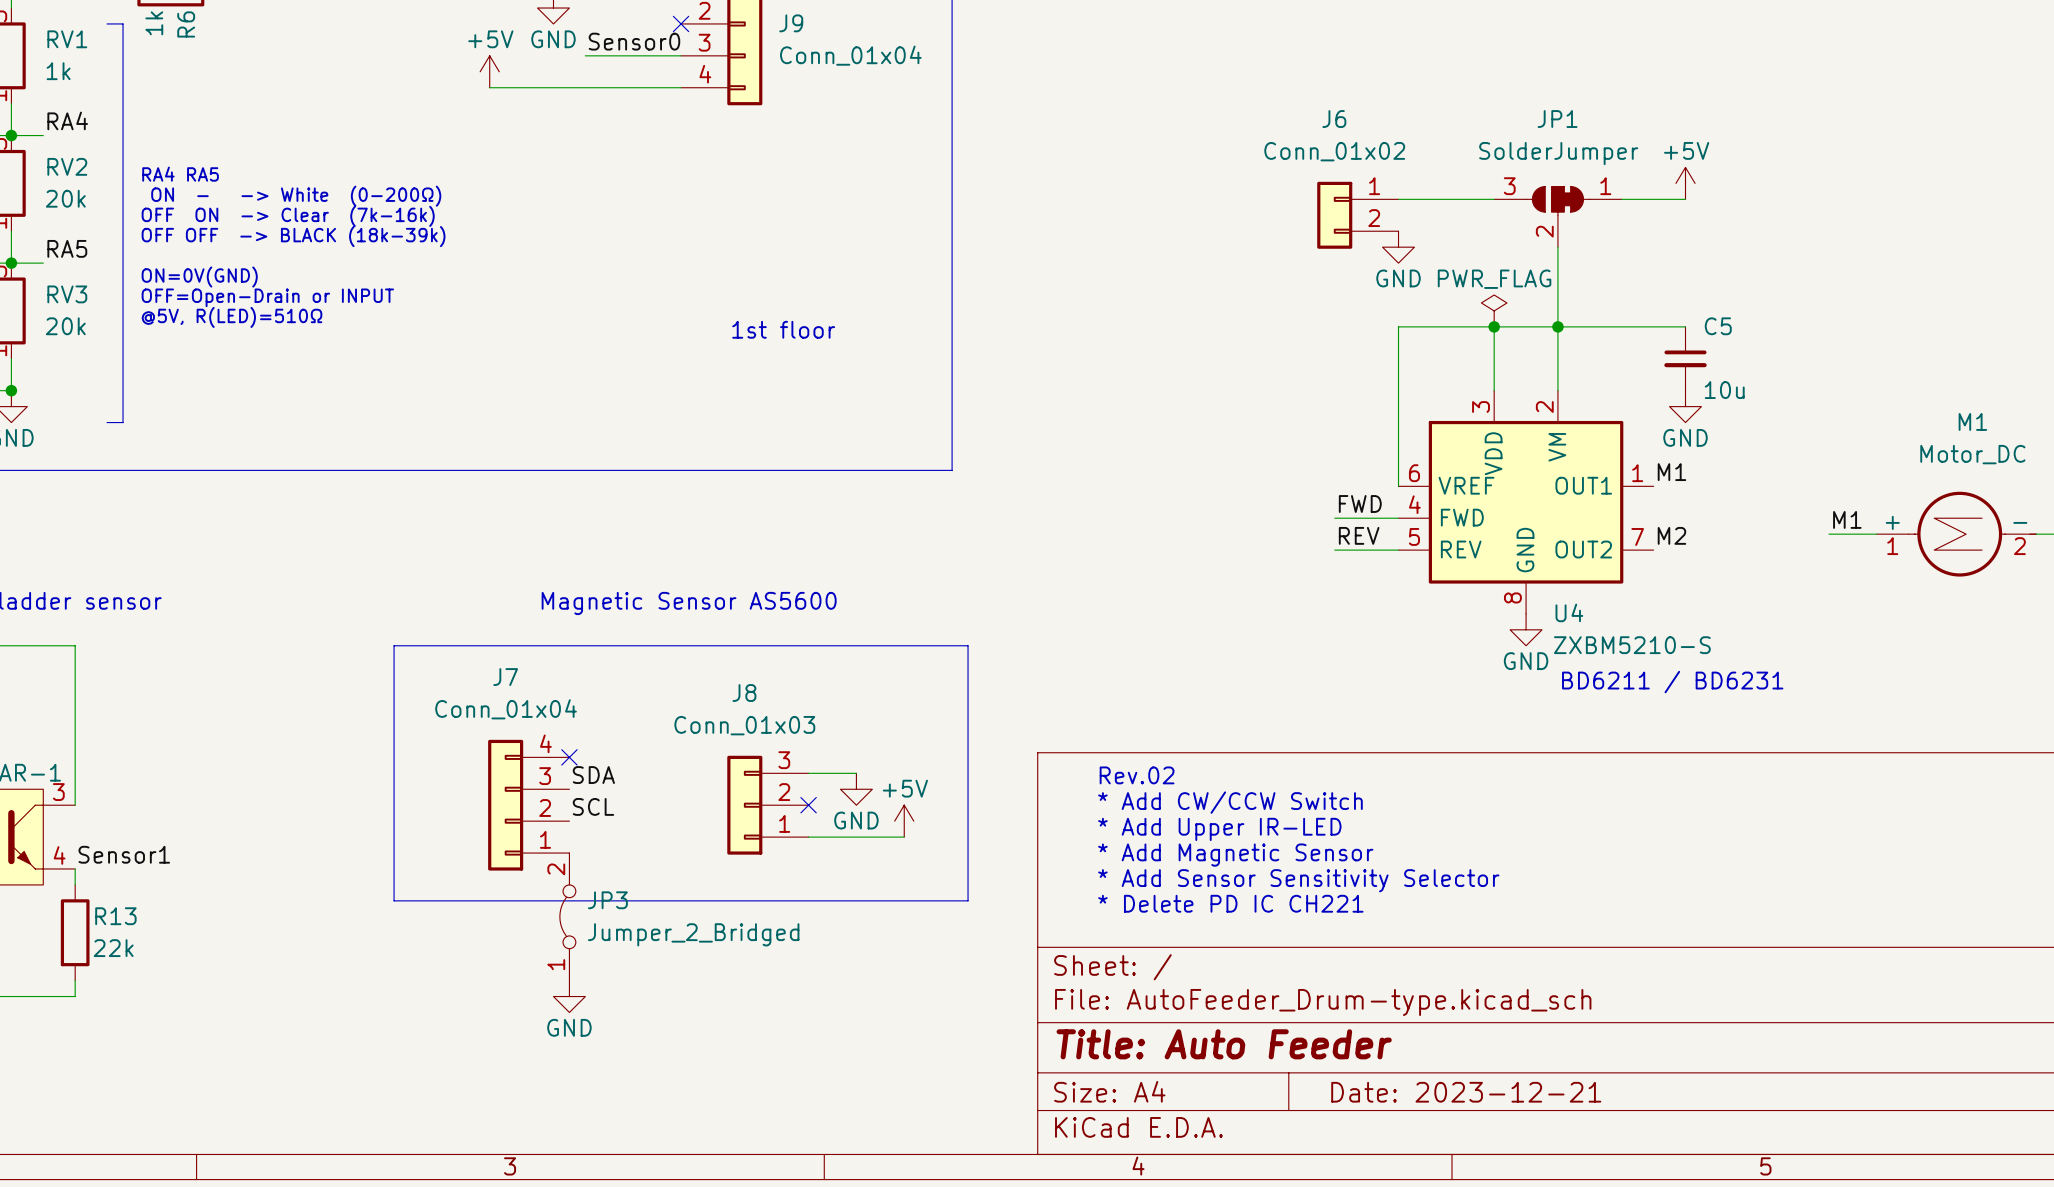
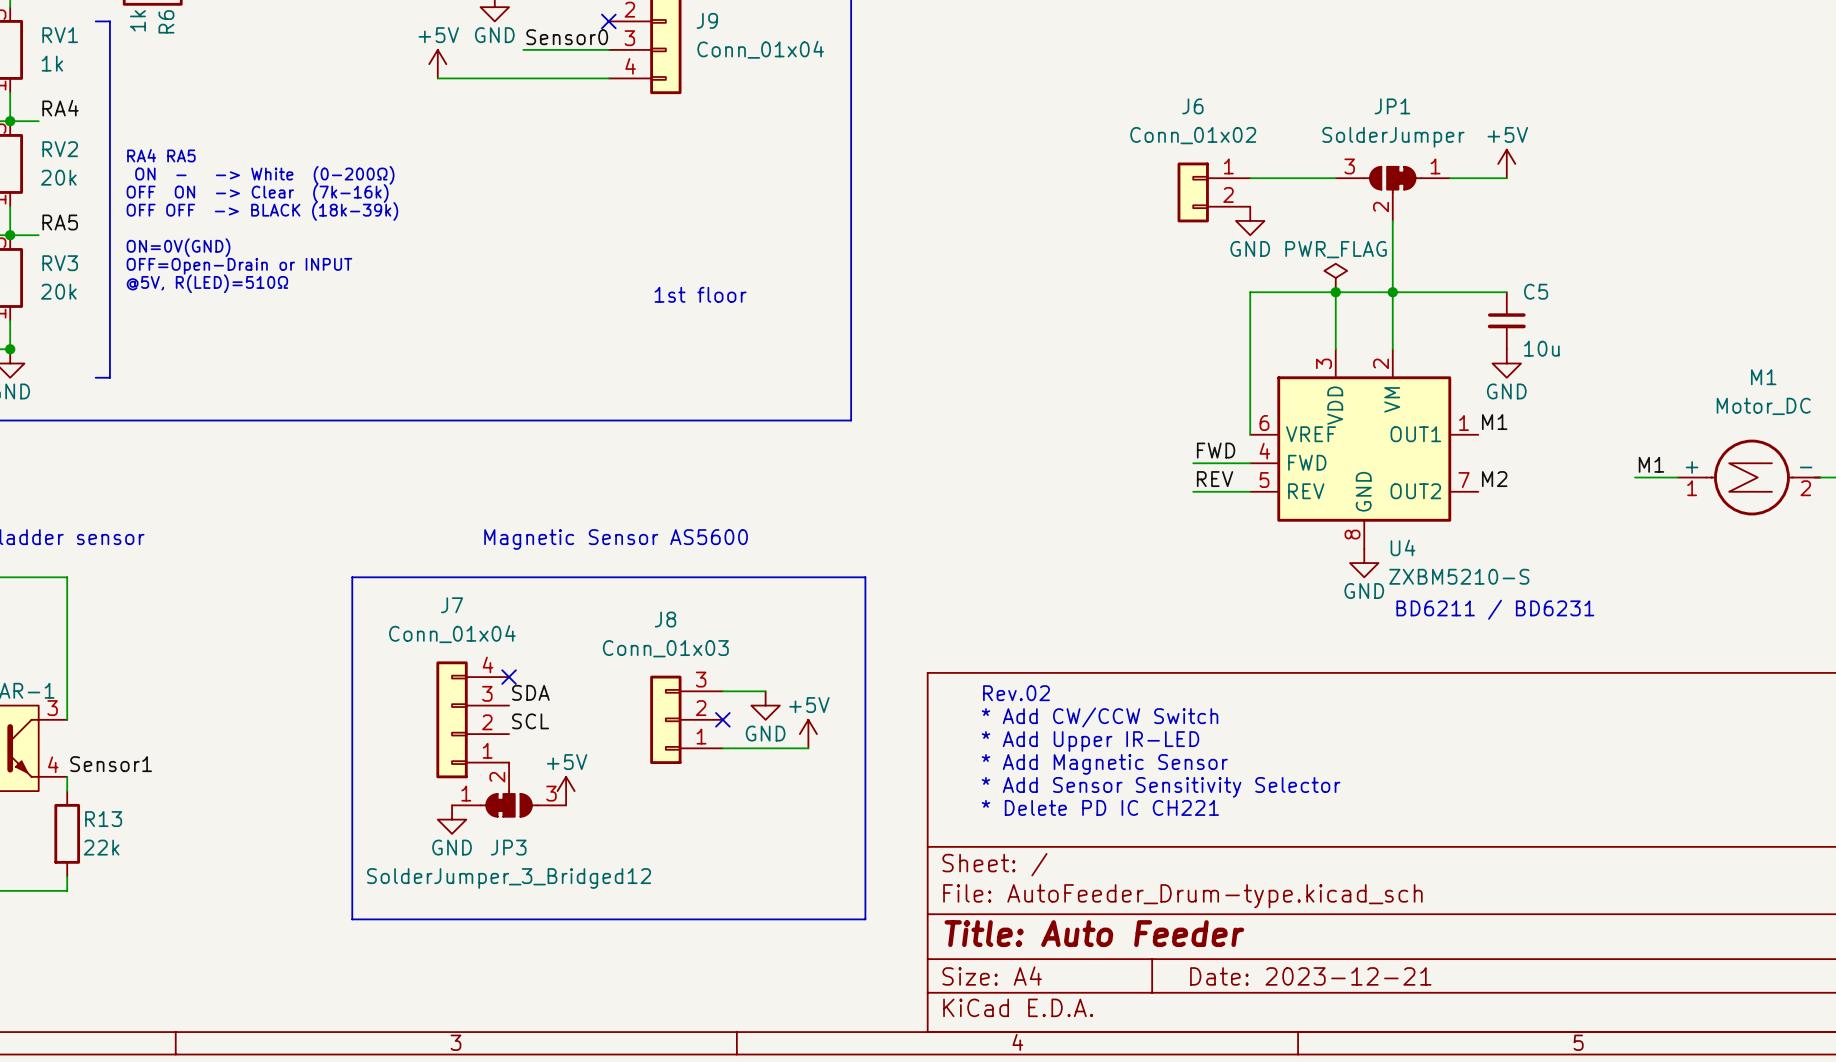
JP3 symbol: [559, 853, 576, 981] -> [452, 762, 567, 817]
power symbol: none -> +5V (566, 791)
line: (394, 900) (968, 900) -> (352, 805) (352, 919) (865, 919) (865, 805)
JP3 name position: JP3 (607, 900) -> JP3 (508, 847)
JP3 value: Jumper_2_Bridged (693, 934) -> SolderJumper_3_Bridged12 (509, 878)
power symbol position: GND (569, 996) -> GND (452, 819)

